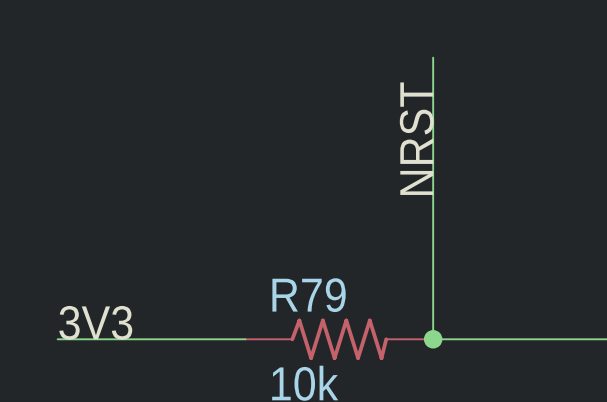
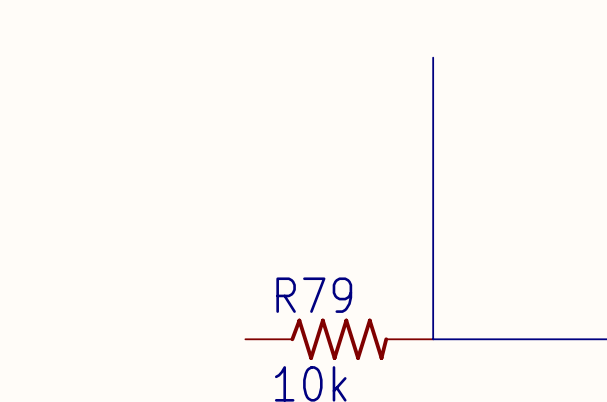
label: NRST (416, 138) -> none
label: 3V3 (95, 322) -> none
wire: (57, 339) (245, 339) -> none
junction: (433, 339) -> none

